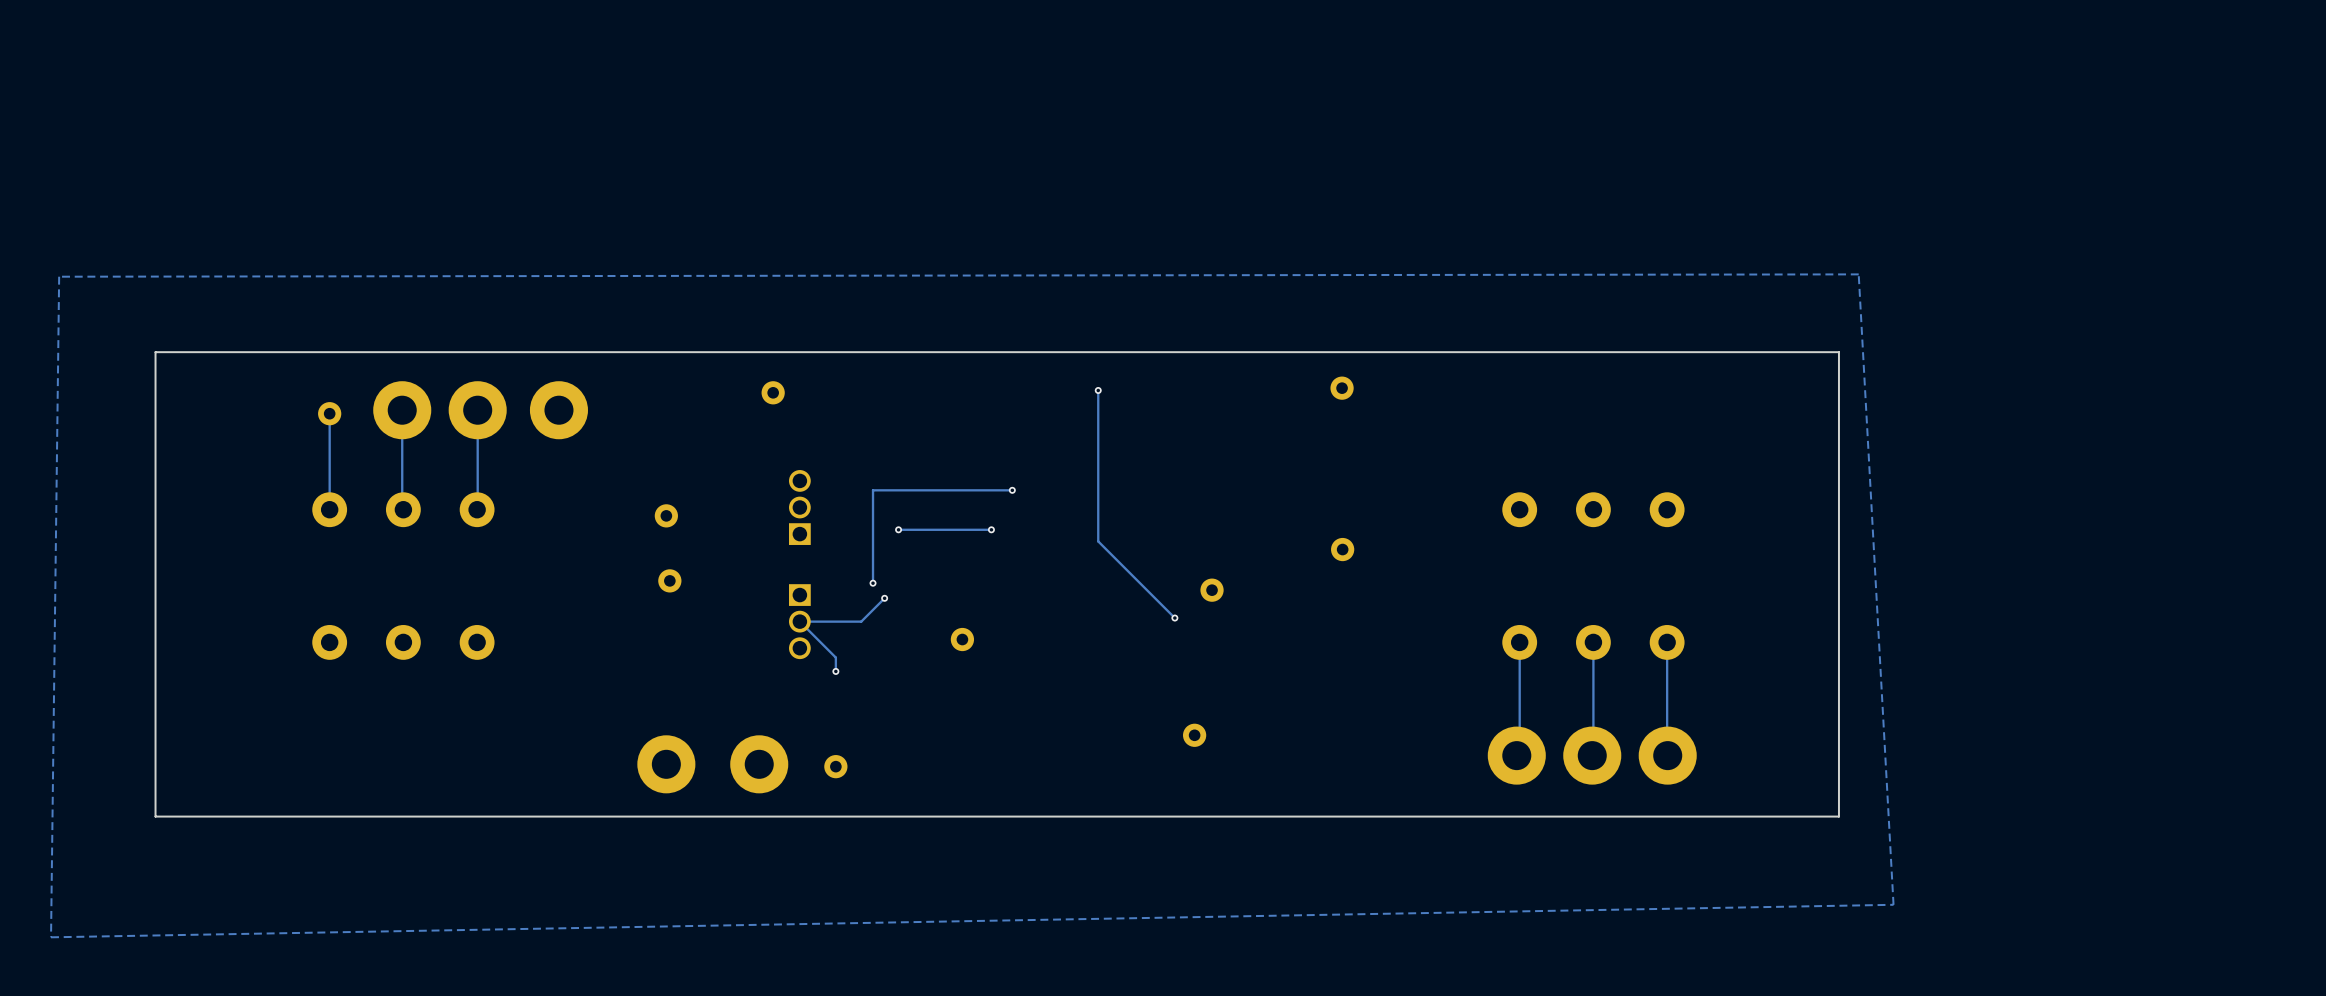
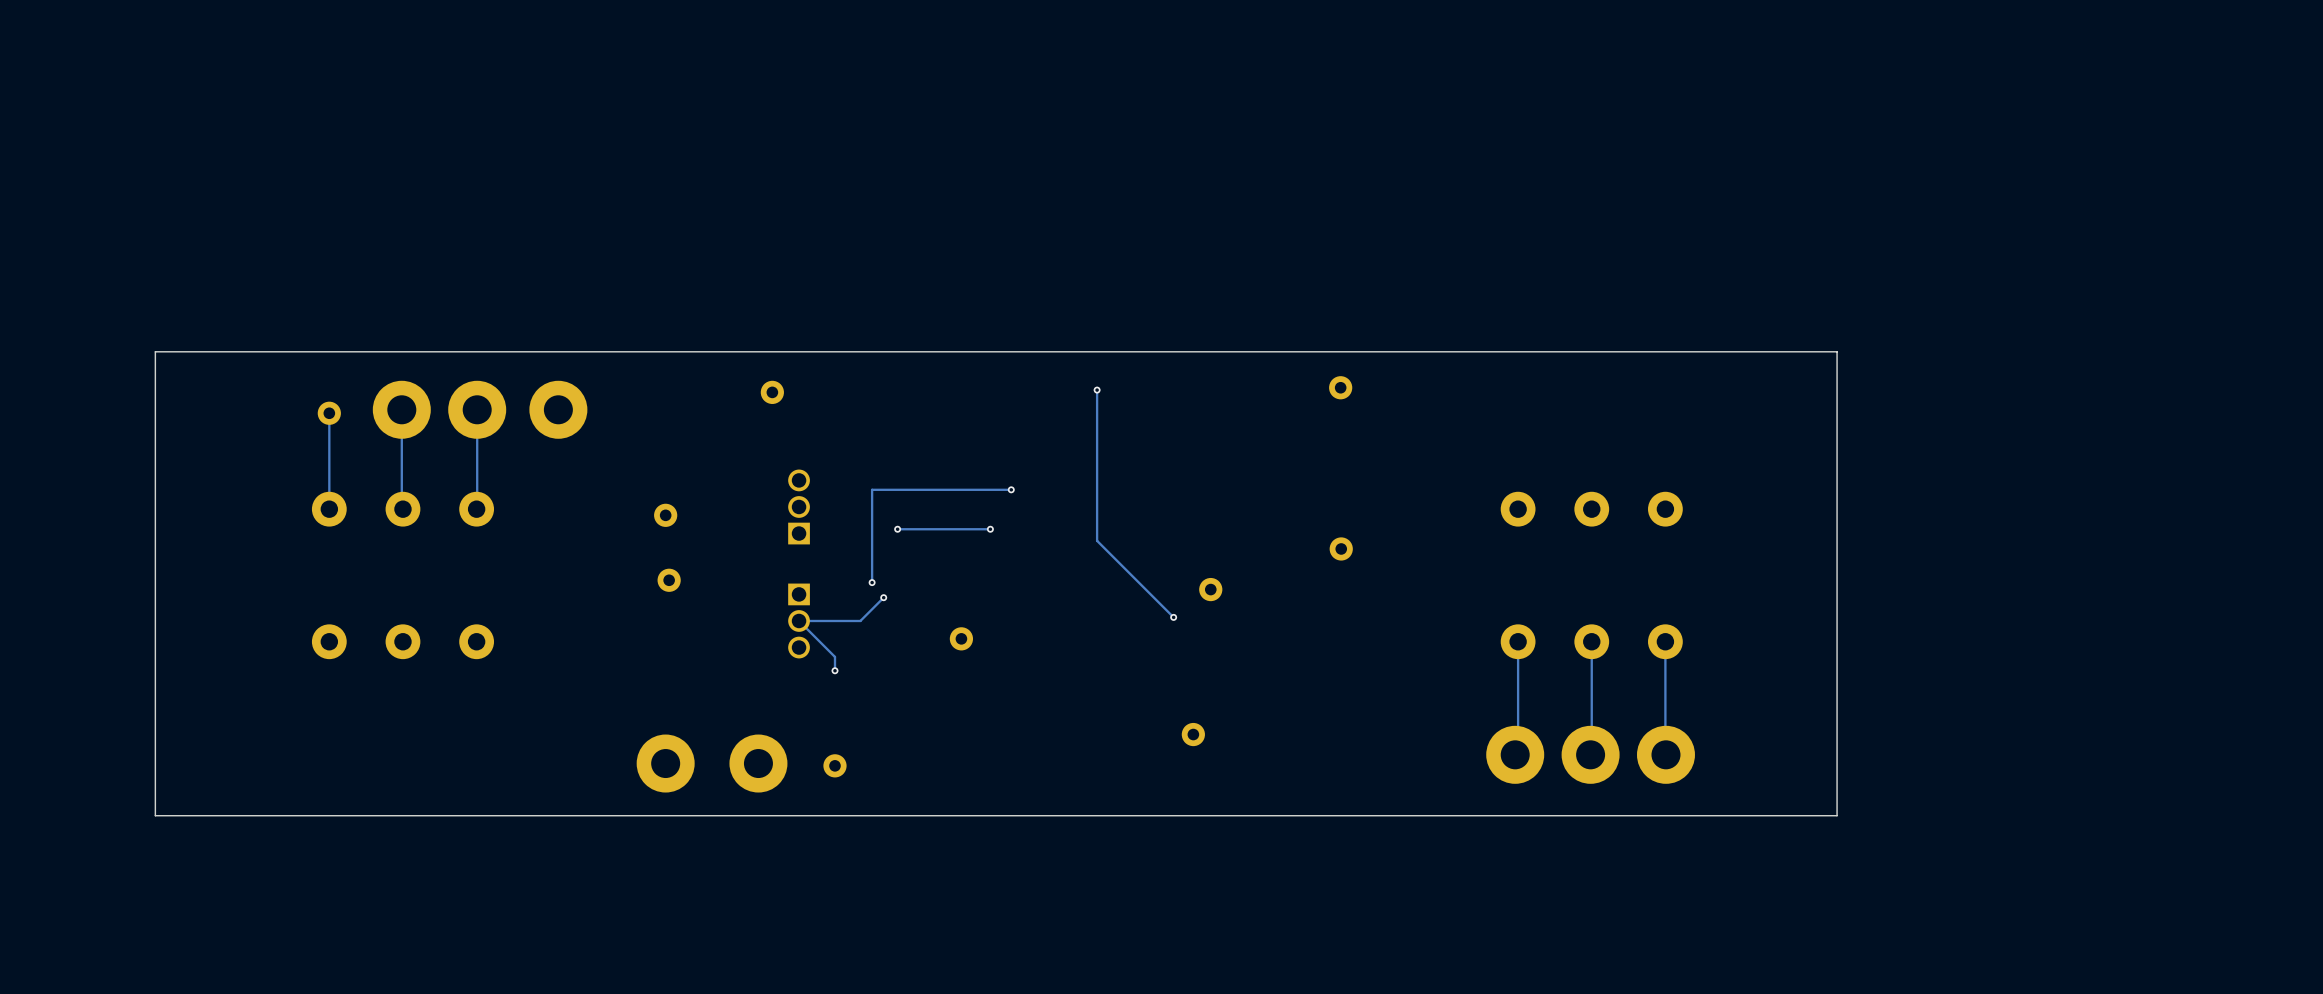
zone outline: (1858, 274) (59, 276) (51, 937) (1893, 904) (1858, 274) -> none

